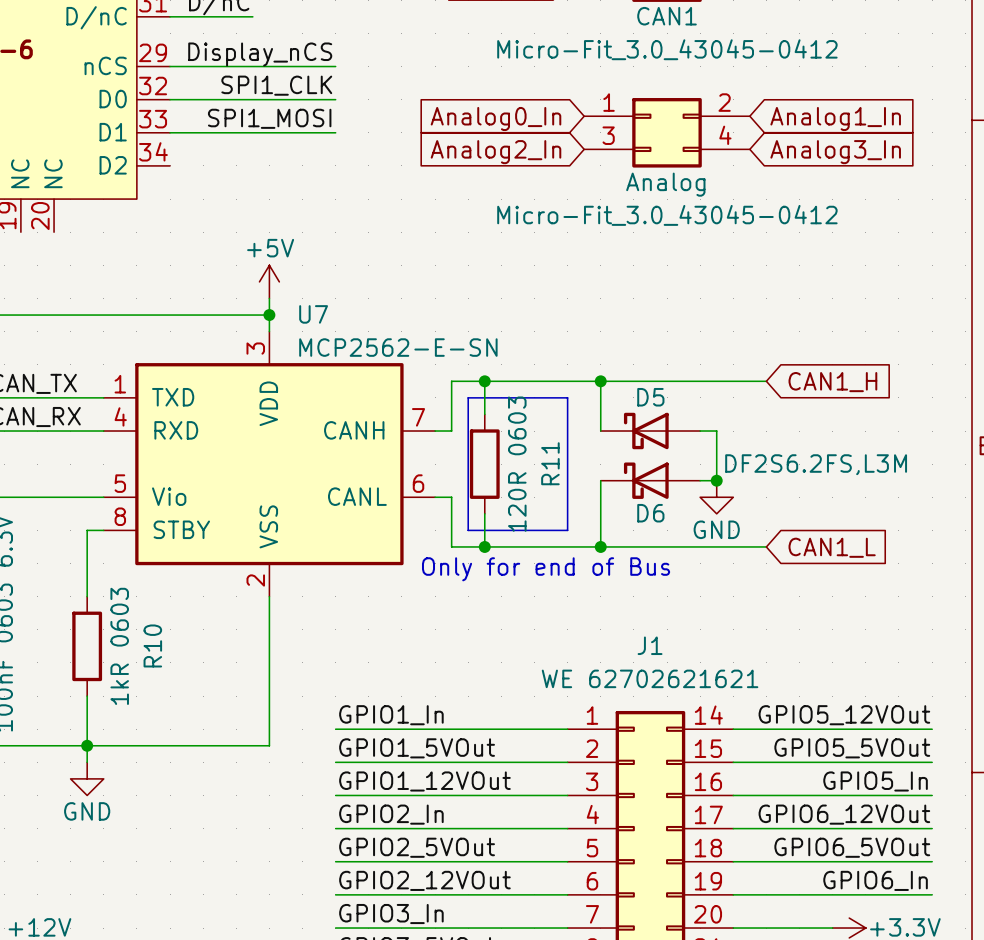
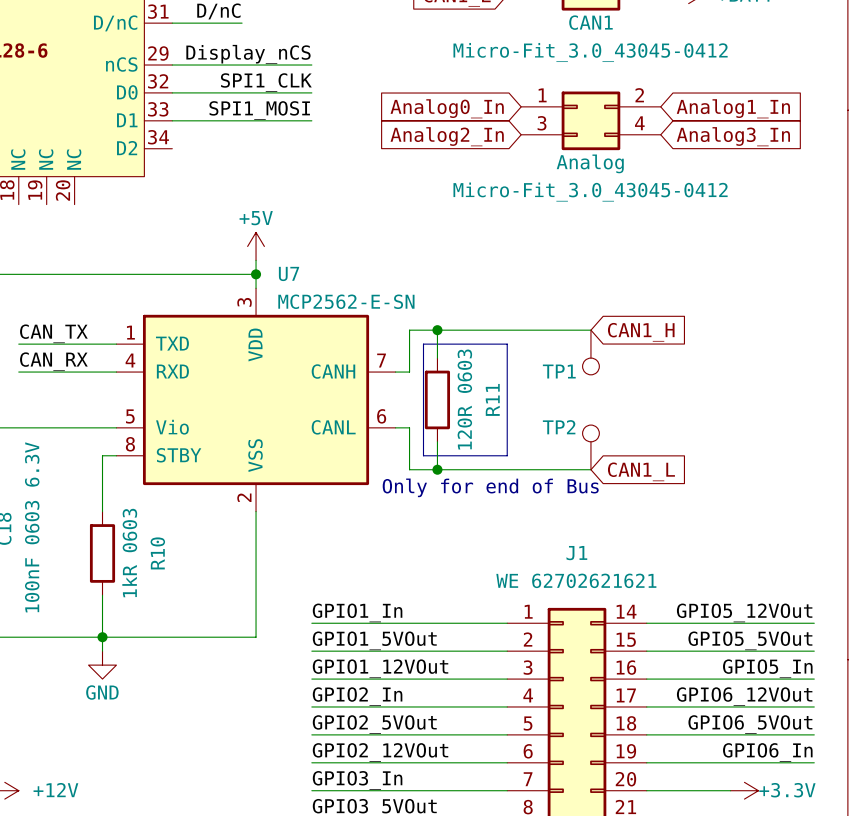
wire: (600, 381) (600, 431) -> none
junction: (600, 381) -> none
wire: (667, 381) (766, 381) -> none
global label position: CAN1_H (832, 382) -> CAN1_H (641, 332)
TP1: none -> (590, 352)
D5: DF2S6.2FS,L3M (650, 431) -> none
wire: (700, 431) (716, 431) (716, 480) (700, 480) -> none
wire: (600, 480) (600, 546) -> none
D6: (650, 480) -> none
junction: (716, 480) -> none
power symbol: GND (716, 497) -> none
TP2: none -> (590, 447)
junction: (600, 546) -> none
wire: (667, 546) (766, 546) -> none
global label position: CAN1_L (832, 547) -> CAN1_L (641, 471)

